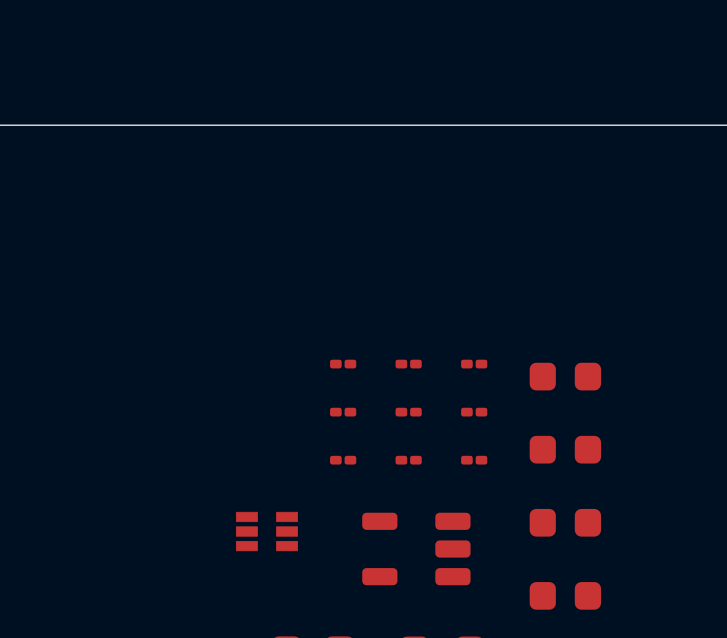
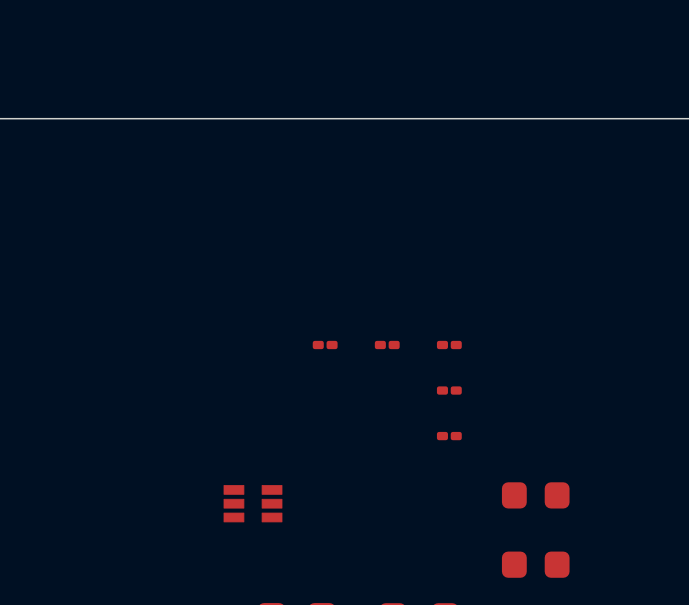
part: (565, 376) -> none
part: (343, 412) -> none
part: (408, 412) -> none
part: (565, 449) -> none
part: (343, 460) -> none
part: (408, 460) -> none
part: (416, 548) -> none

